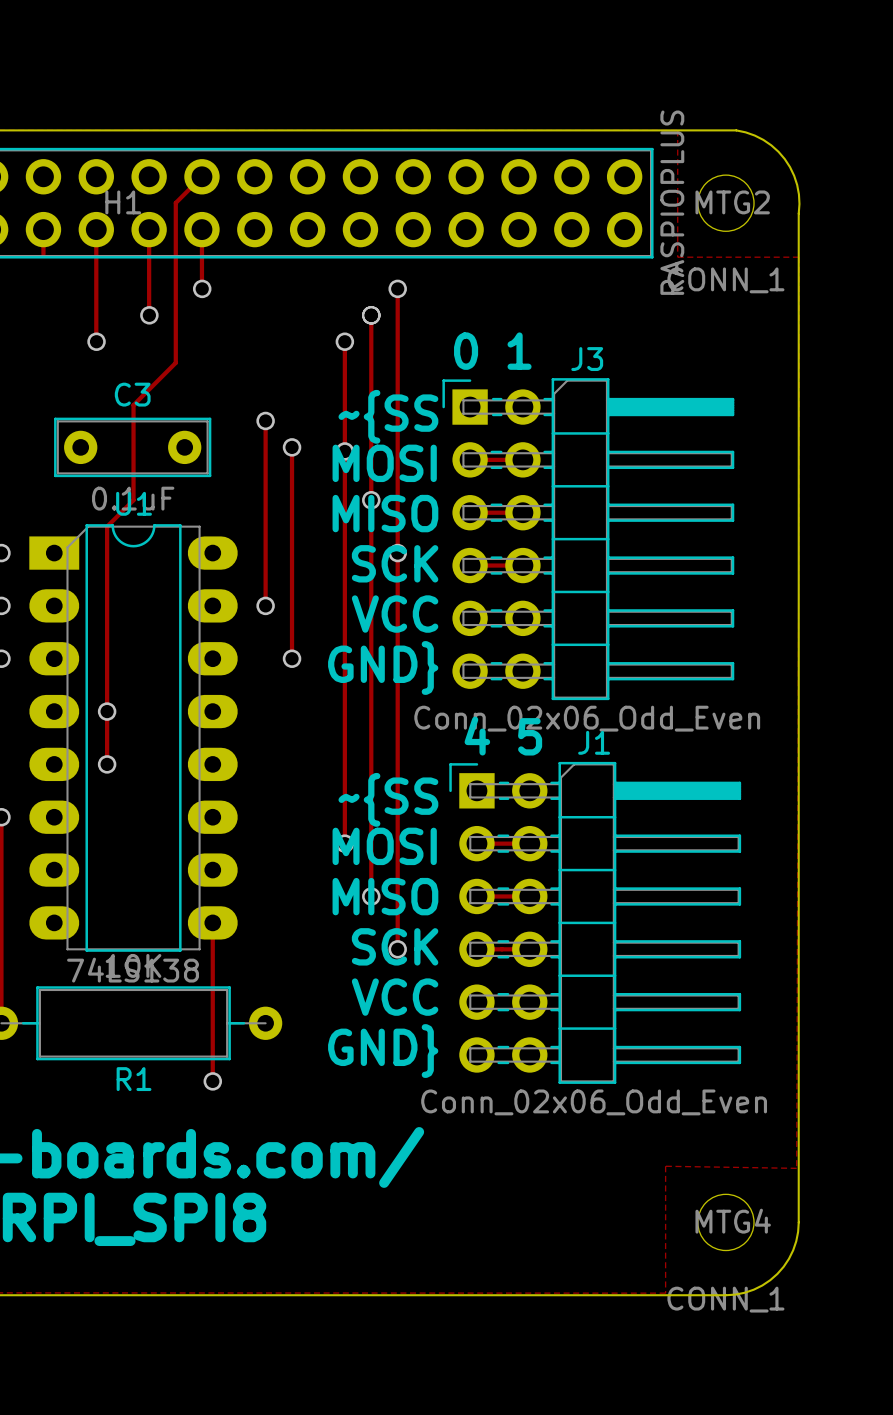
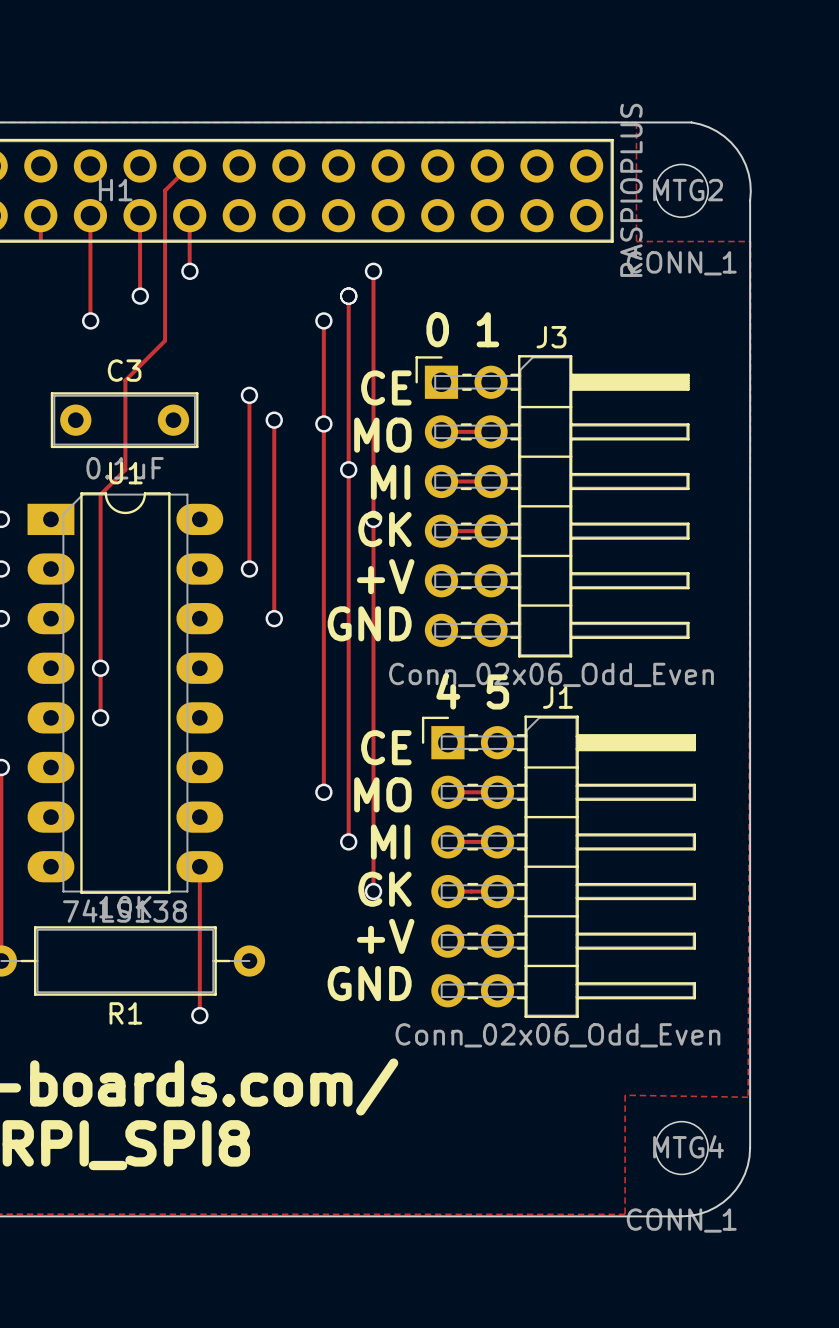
text: ~{SS (388, 416) -> CE (386, 387)
text: MOSI (384, 463) -> MO (382, 435)
text: MISO (385, 513) -> MI (390, 482)
text: SCK (395, 563) -> CK (384, 529)
text: VCC (395, 614) -> +V (385, 576)
text: GND} (383, 667) -> GND (369, 623)
text: ~{SS (388, 799) -> CE (386, 747)
text: MOSI (384, 846) -> MO (382, 794)
text: MISO (385, 896) -> MI (390, 842)
text: SCK (395, 946) -> CK (384, 889)
text: VCC (395, 997) -> +V (385, 936)
text: GND} (383, 1051) -> GND (369, 983)

